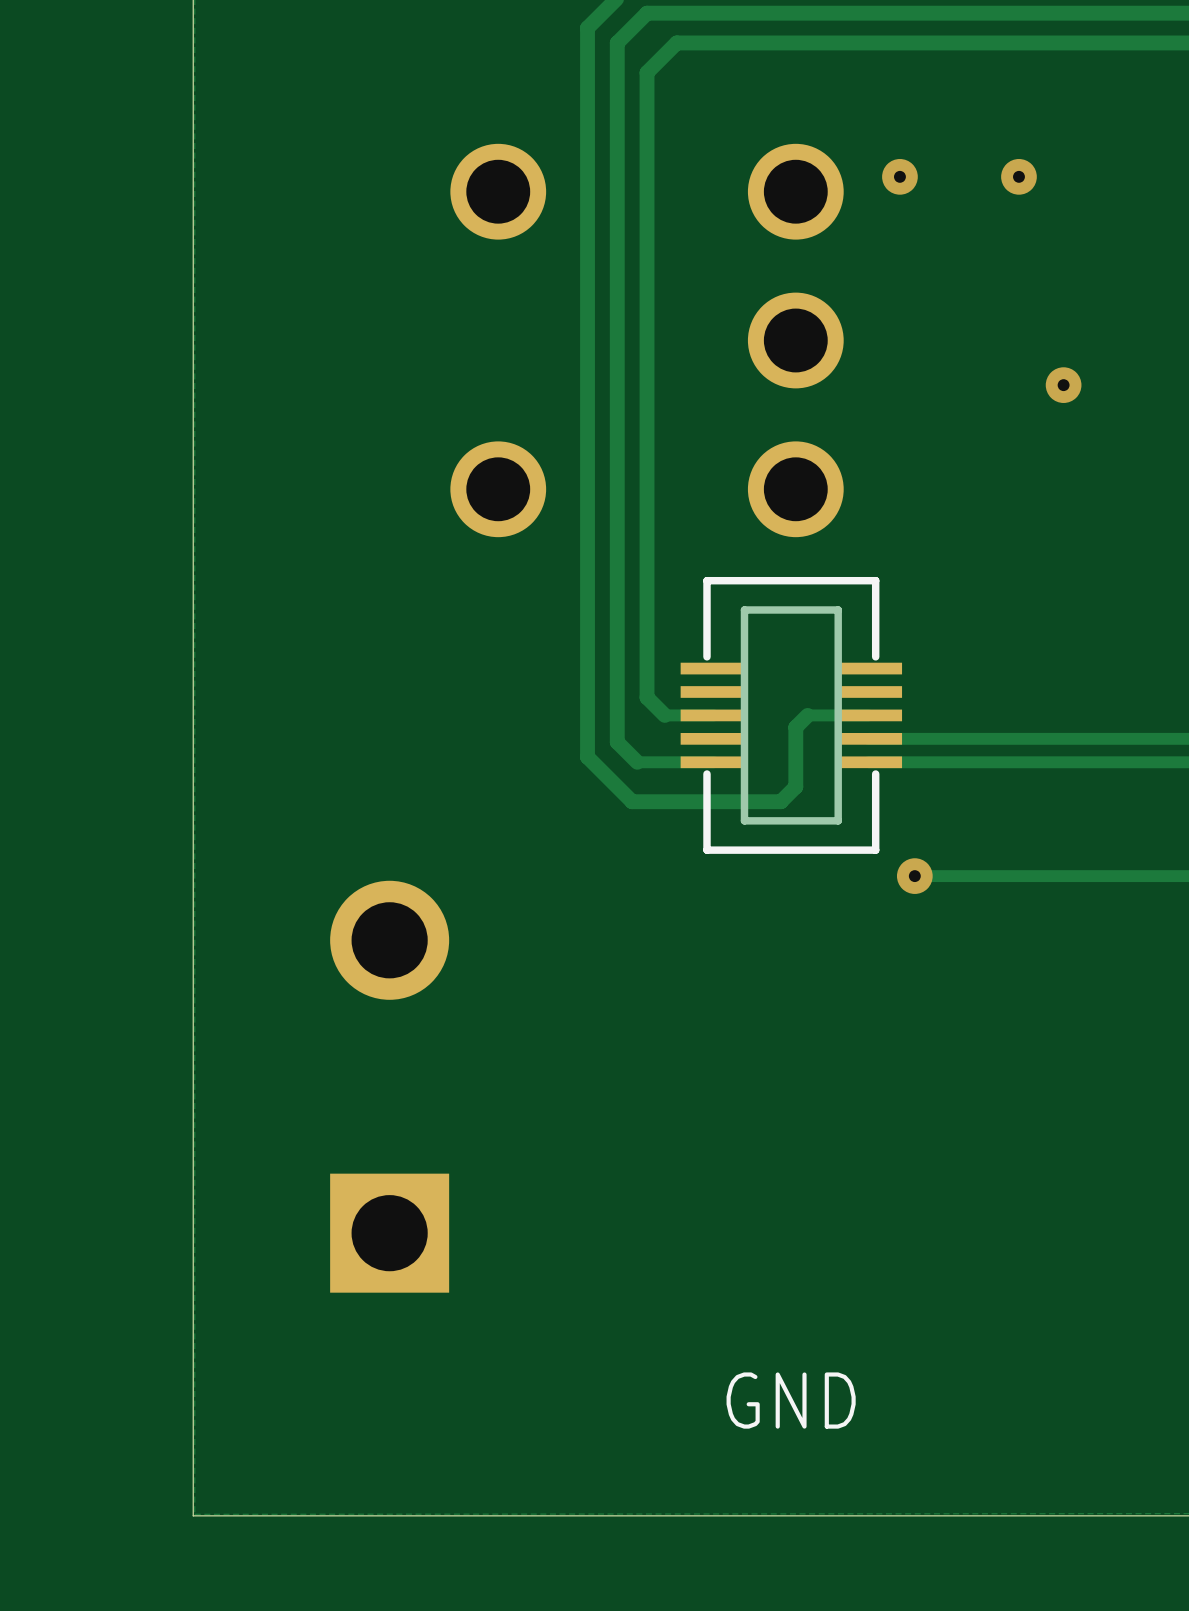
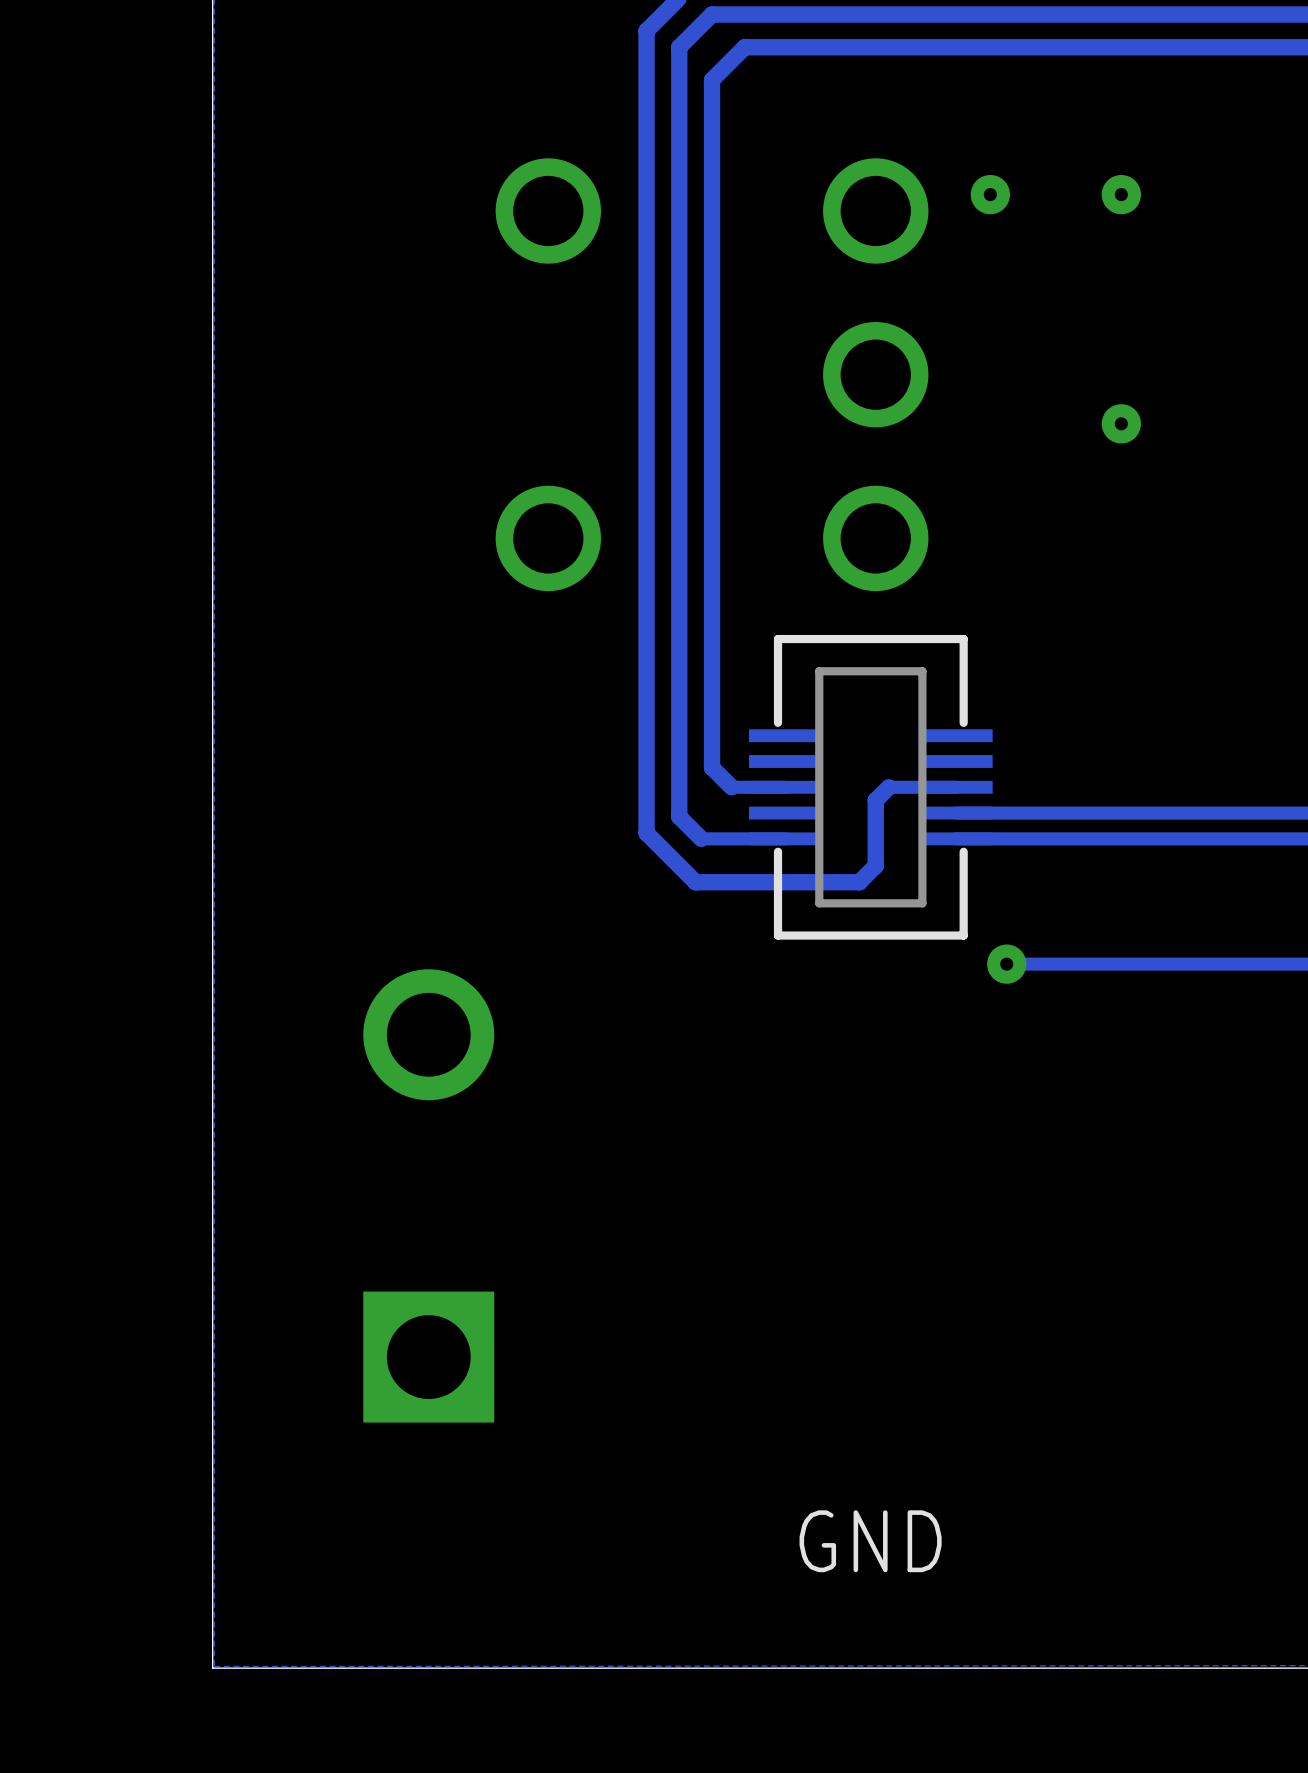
via position: (1063, 385) -> (1121, 423)

